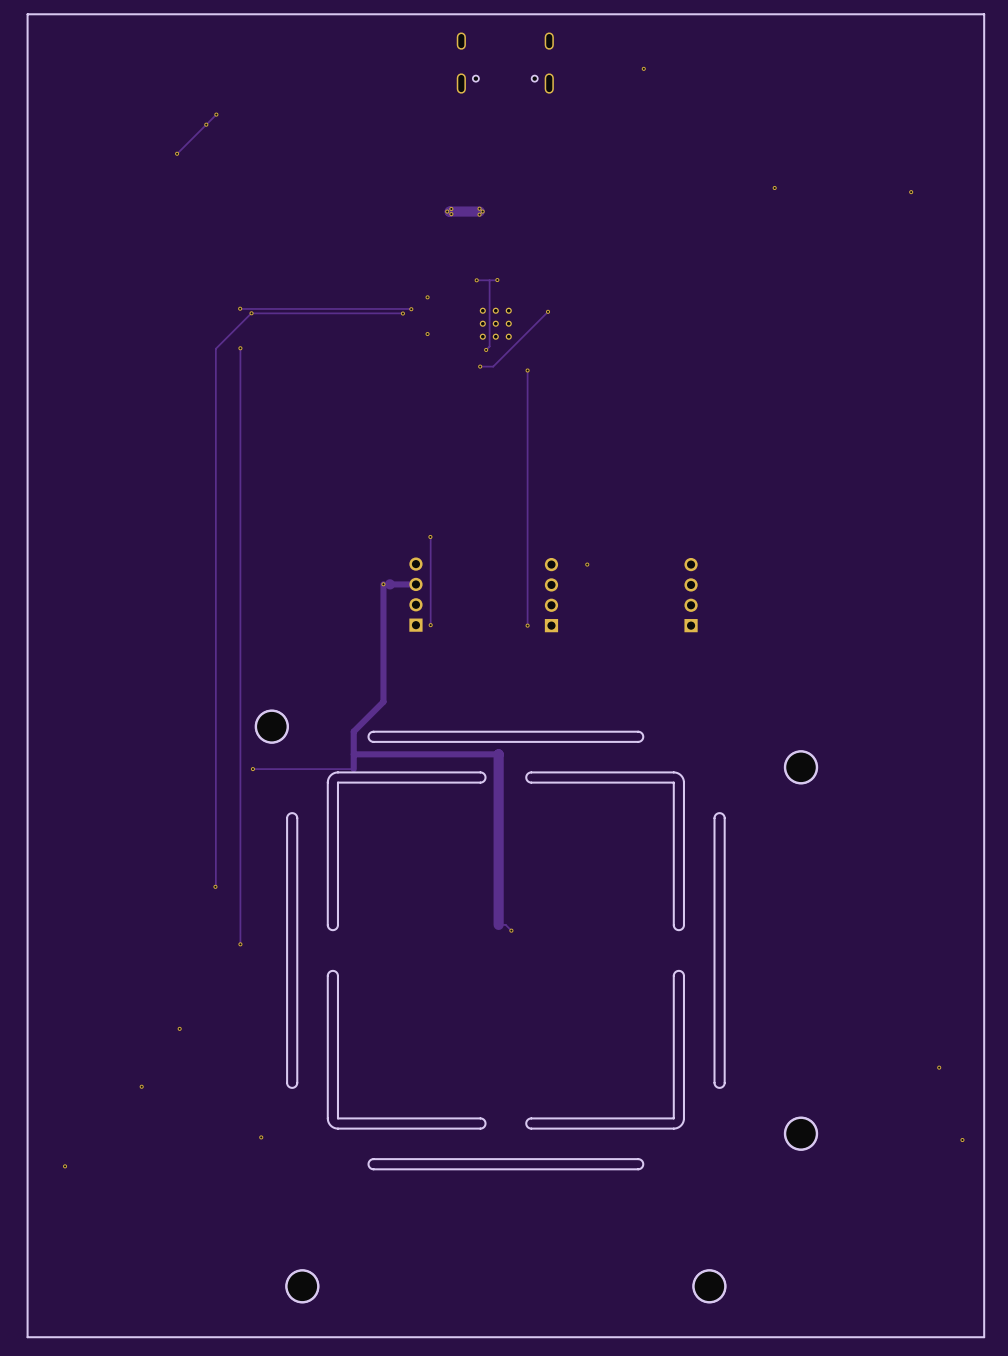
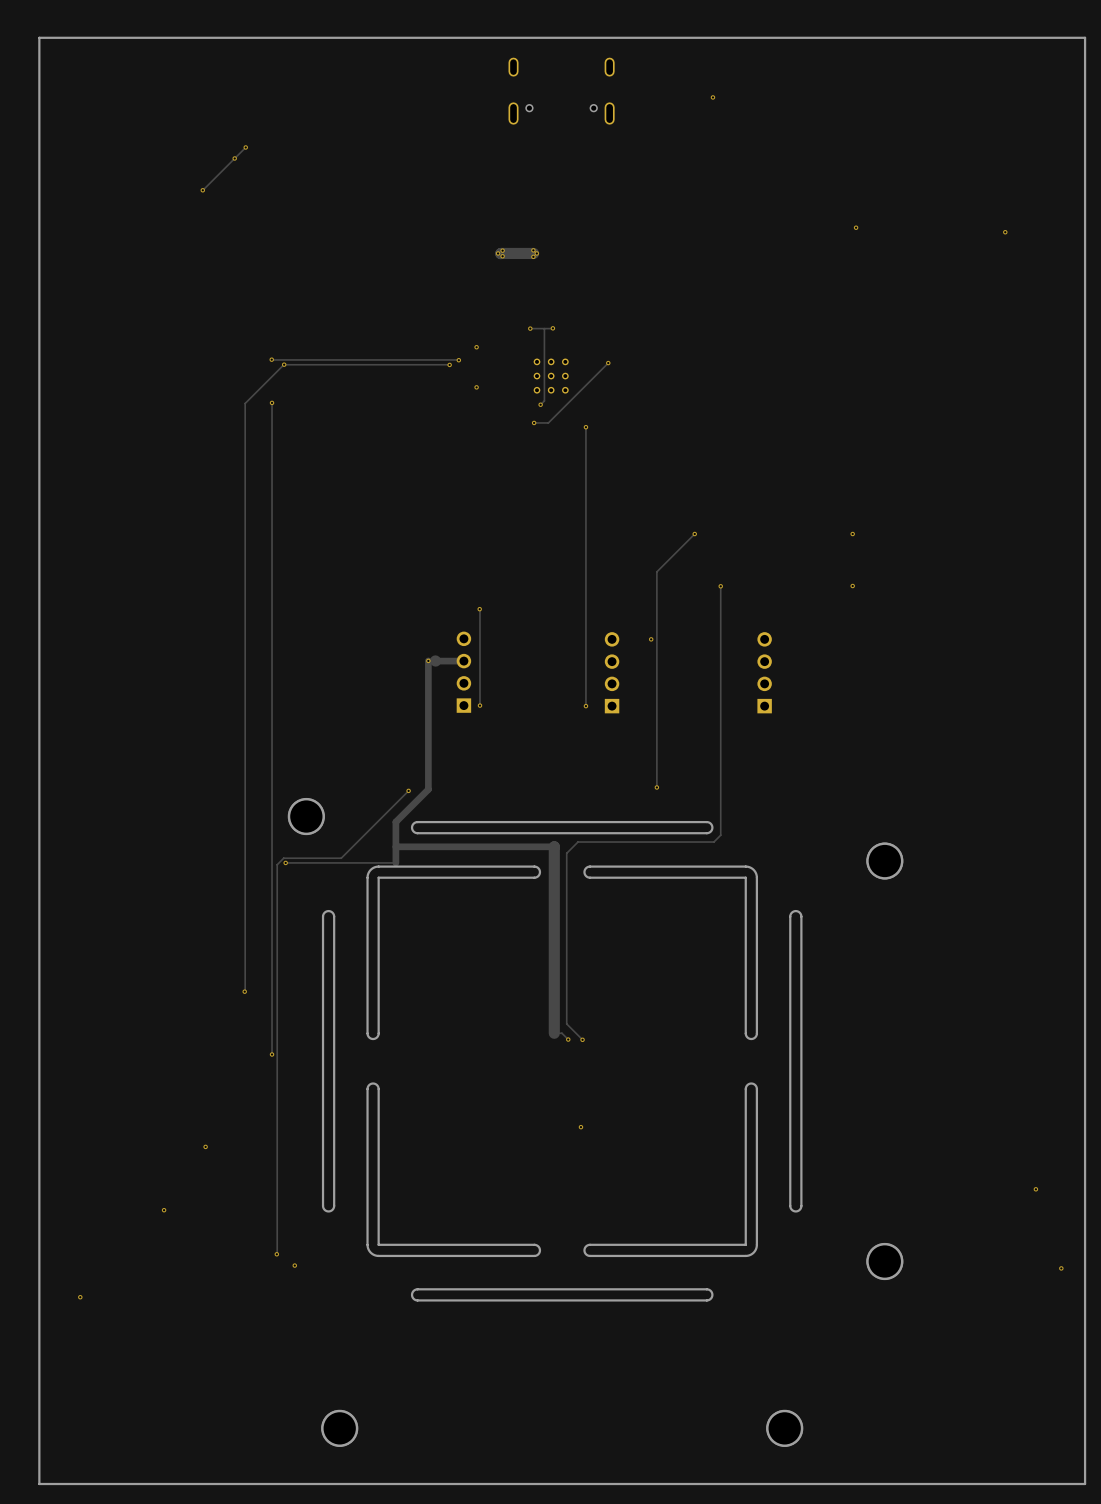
track: none -> (694, 534) (656, 571) (656, 787)
via: none -> (694, 534)
via: none -> (852, 534)
via: none -> (852, 586)
track: none -> (720, 586) (720, 835) (713, 842) (578, 842) (566, 853) (566, 1023) (582, 1039)
via: none -> (720, 586)
via: none -> (656, 787)
track: none -> (408, 790) (341, 858) (283, 858) (277, 864) (276, 1254)
via: none -> (408, 790)
via: none -> (582, 1039)
via: none -> (580, 1127)
via: none -> (276, 1254)

